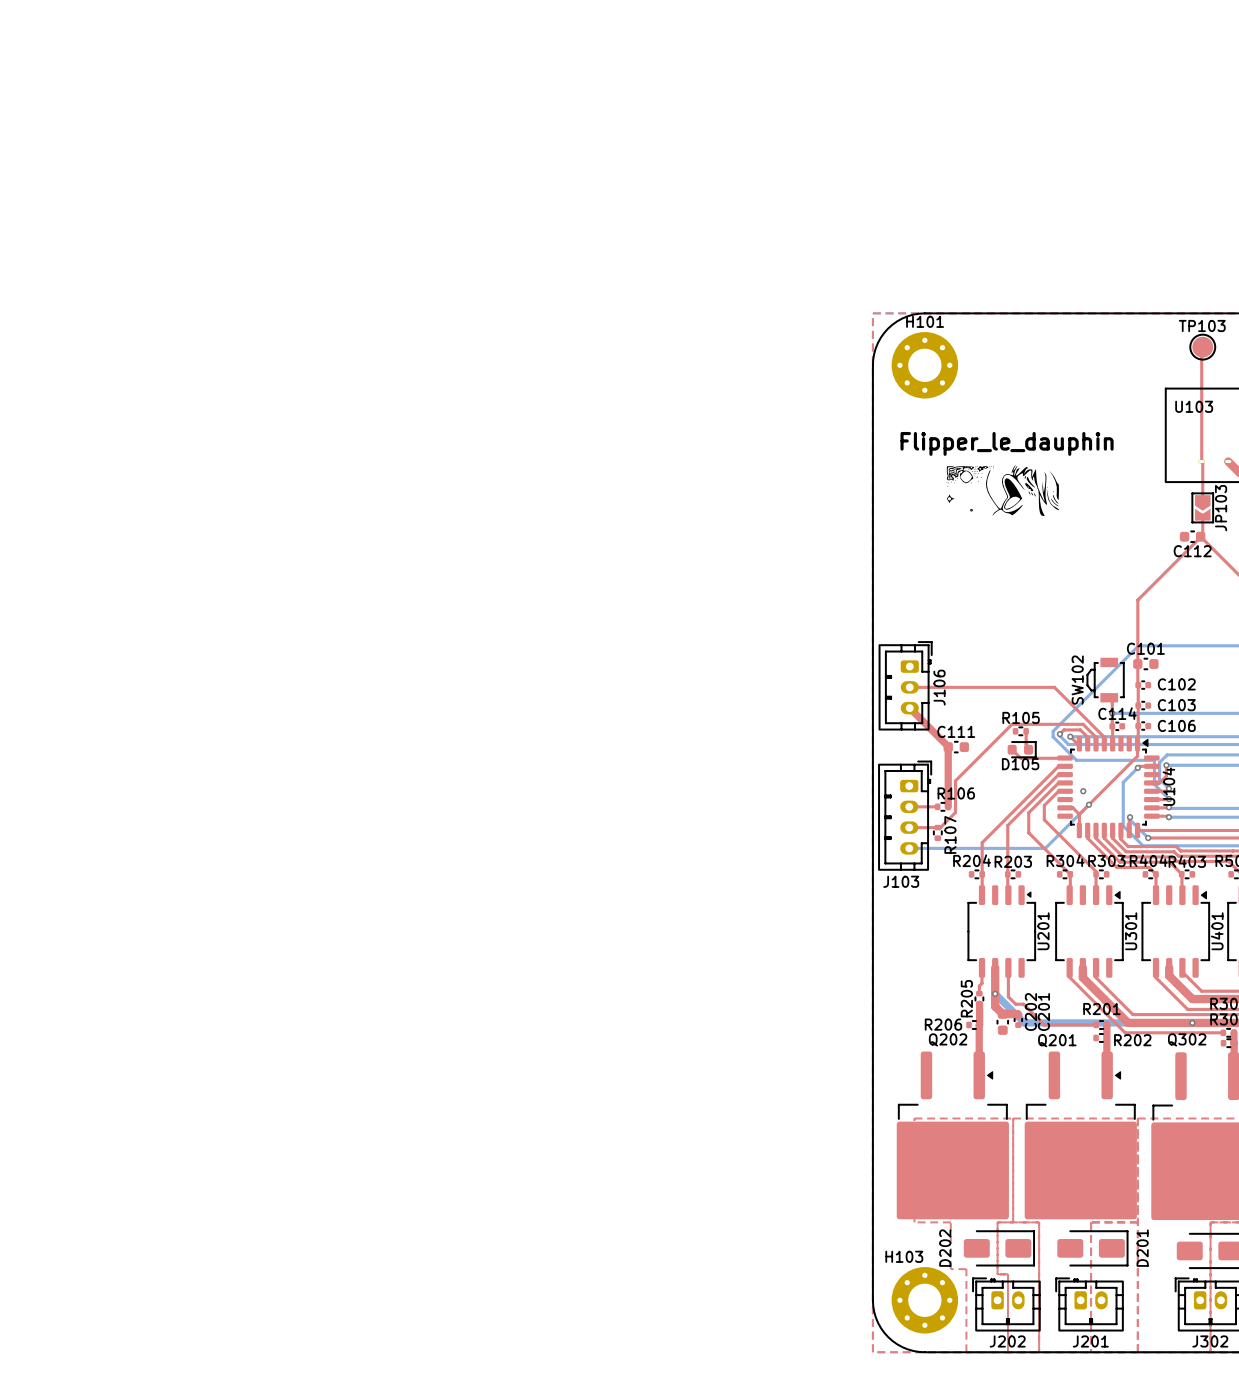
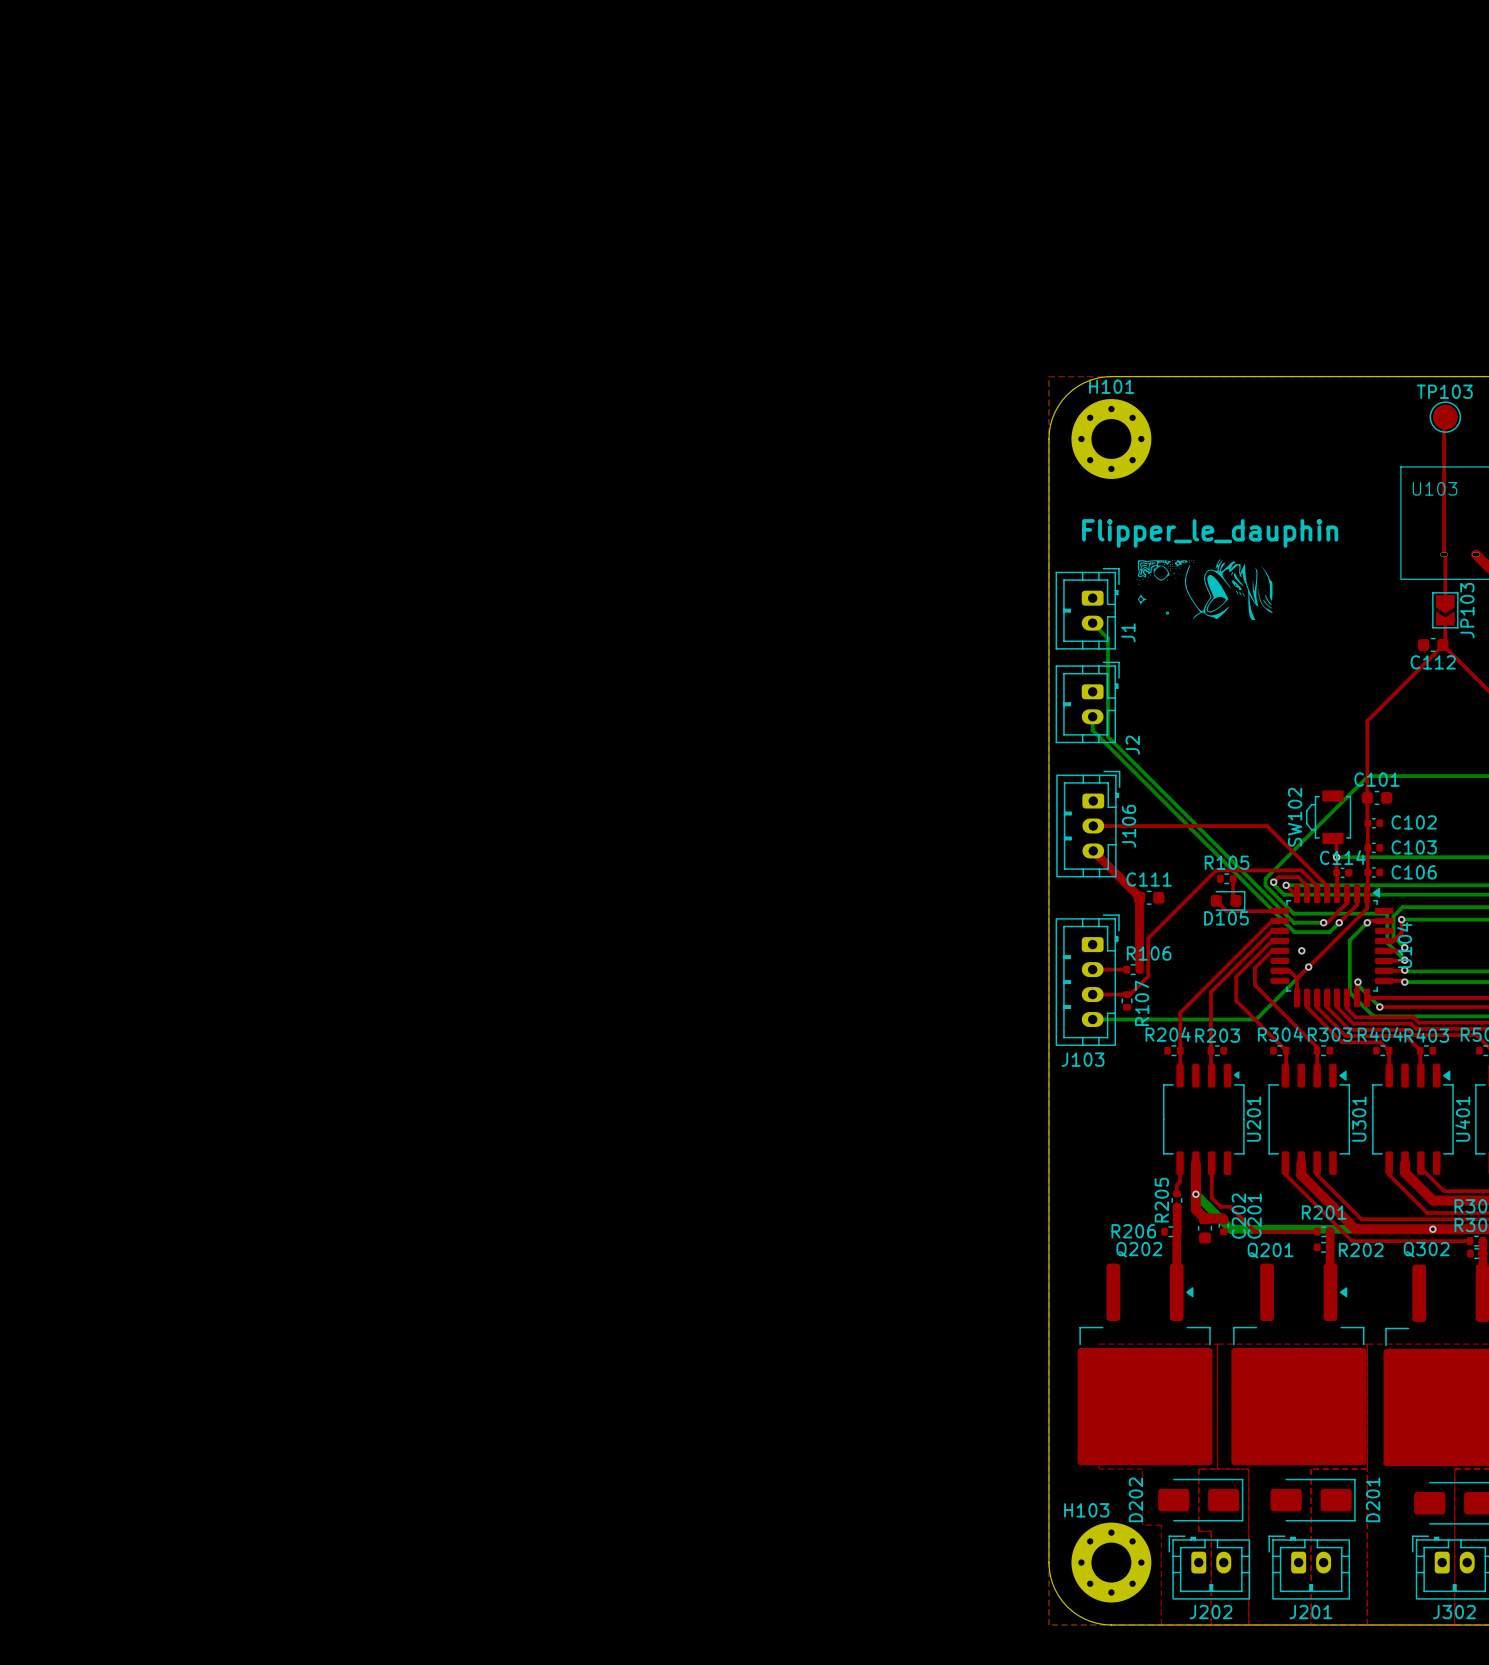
J1: none -> (1087, 608)
bottom track: none -> (1092, 623) (1107, 638) (1107, 736) (1293, 922) (1323, 922)
J2: none -> (1087, 702)
bottom track: none -> (1092, 716) (1092, 730) (1294, 932) (1329, 932) (1339, 922)
top track: none -> (1347, 893) (1347, 903) (1327, 922) (1323, 922)
top track: none -> (1357, 893) (1357, 904) (1339, 922)
via: none -> (1323, 922)
via: none -> (1339, 922)

